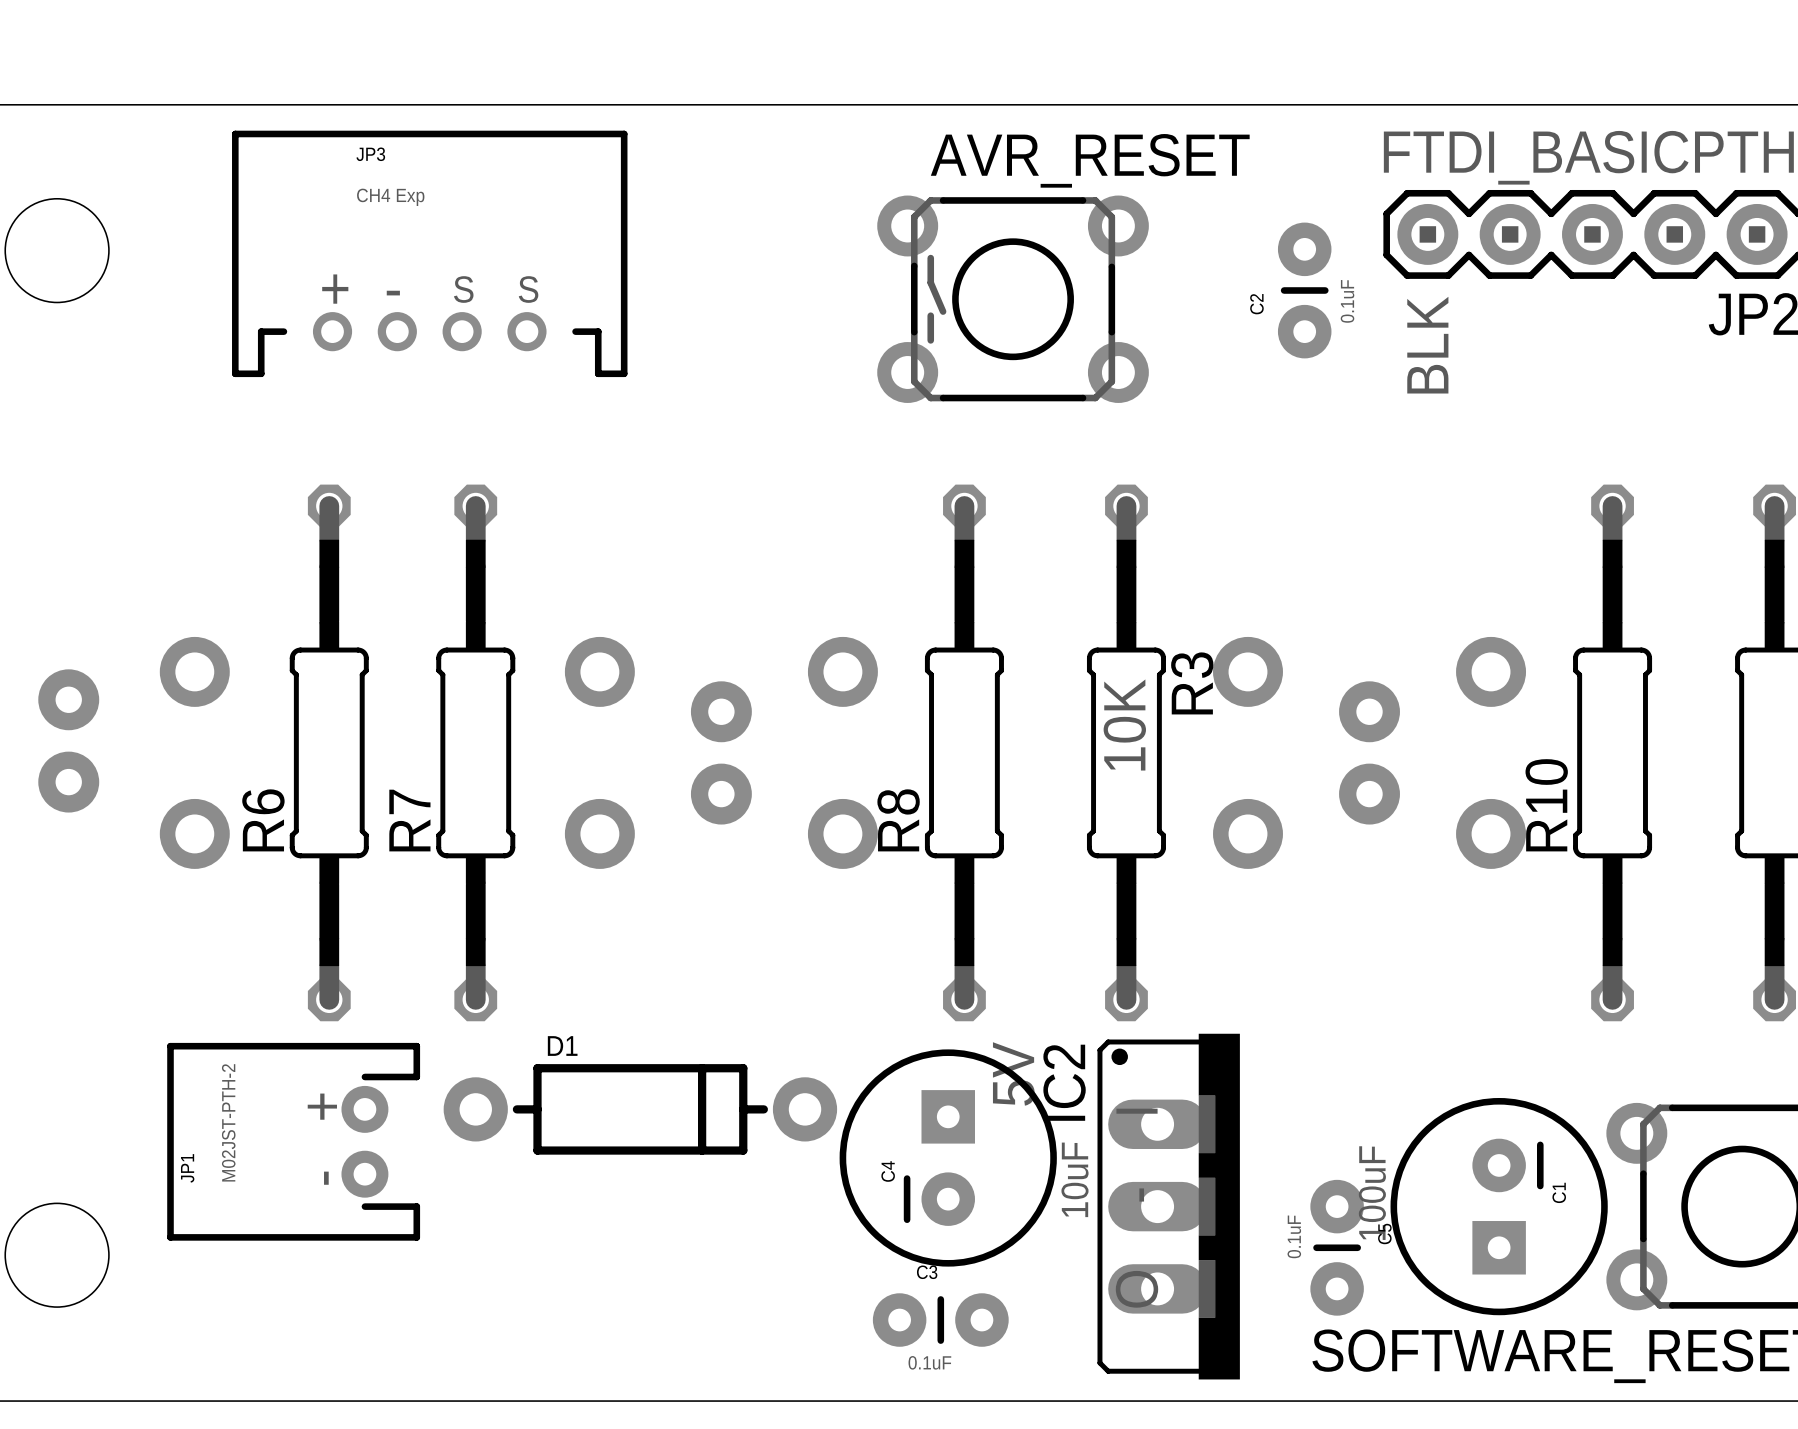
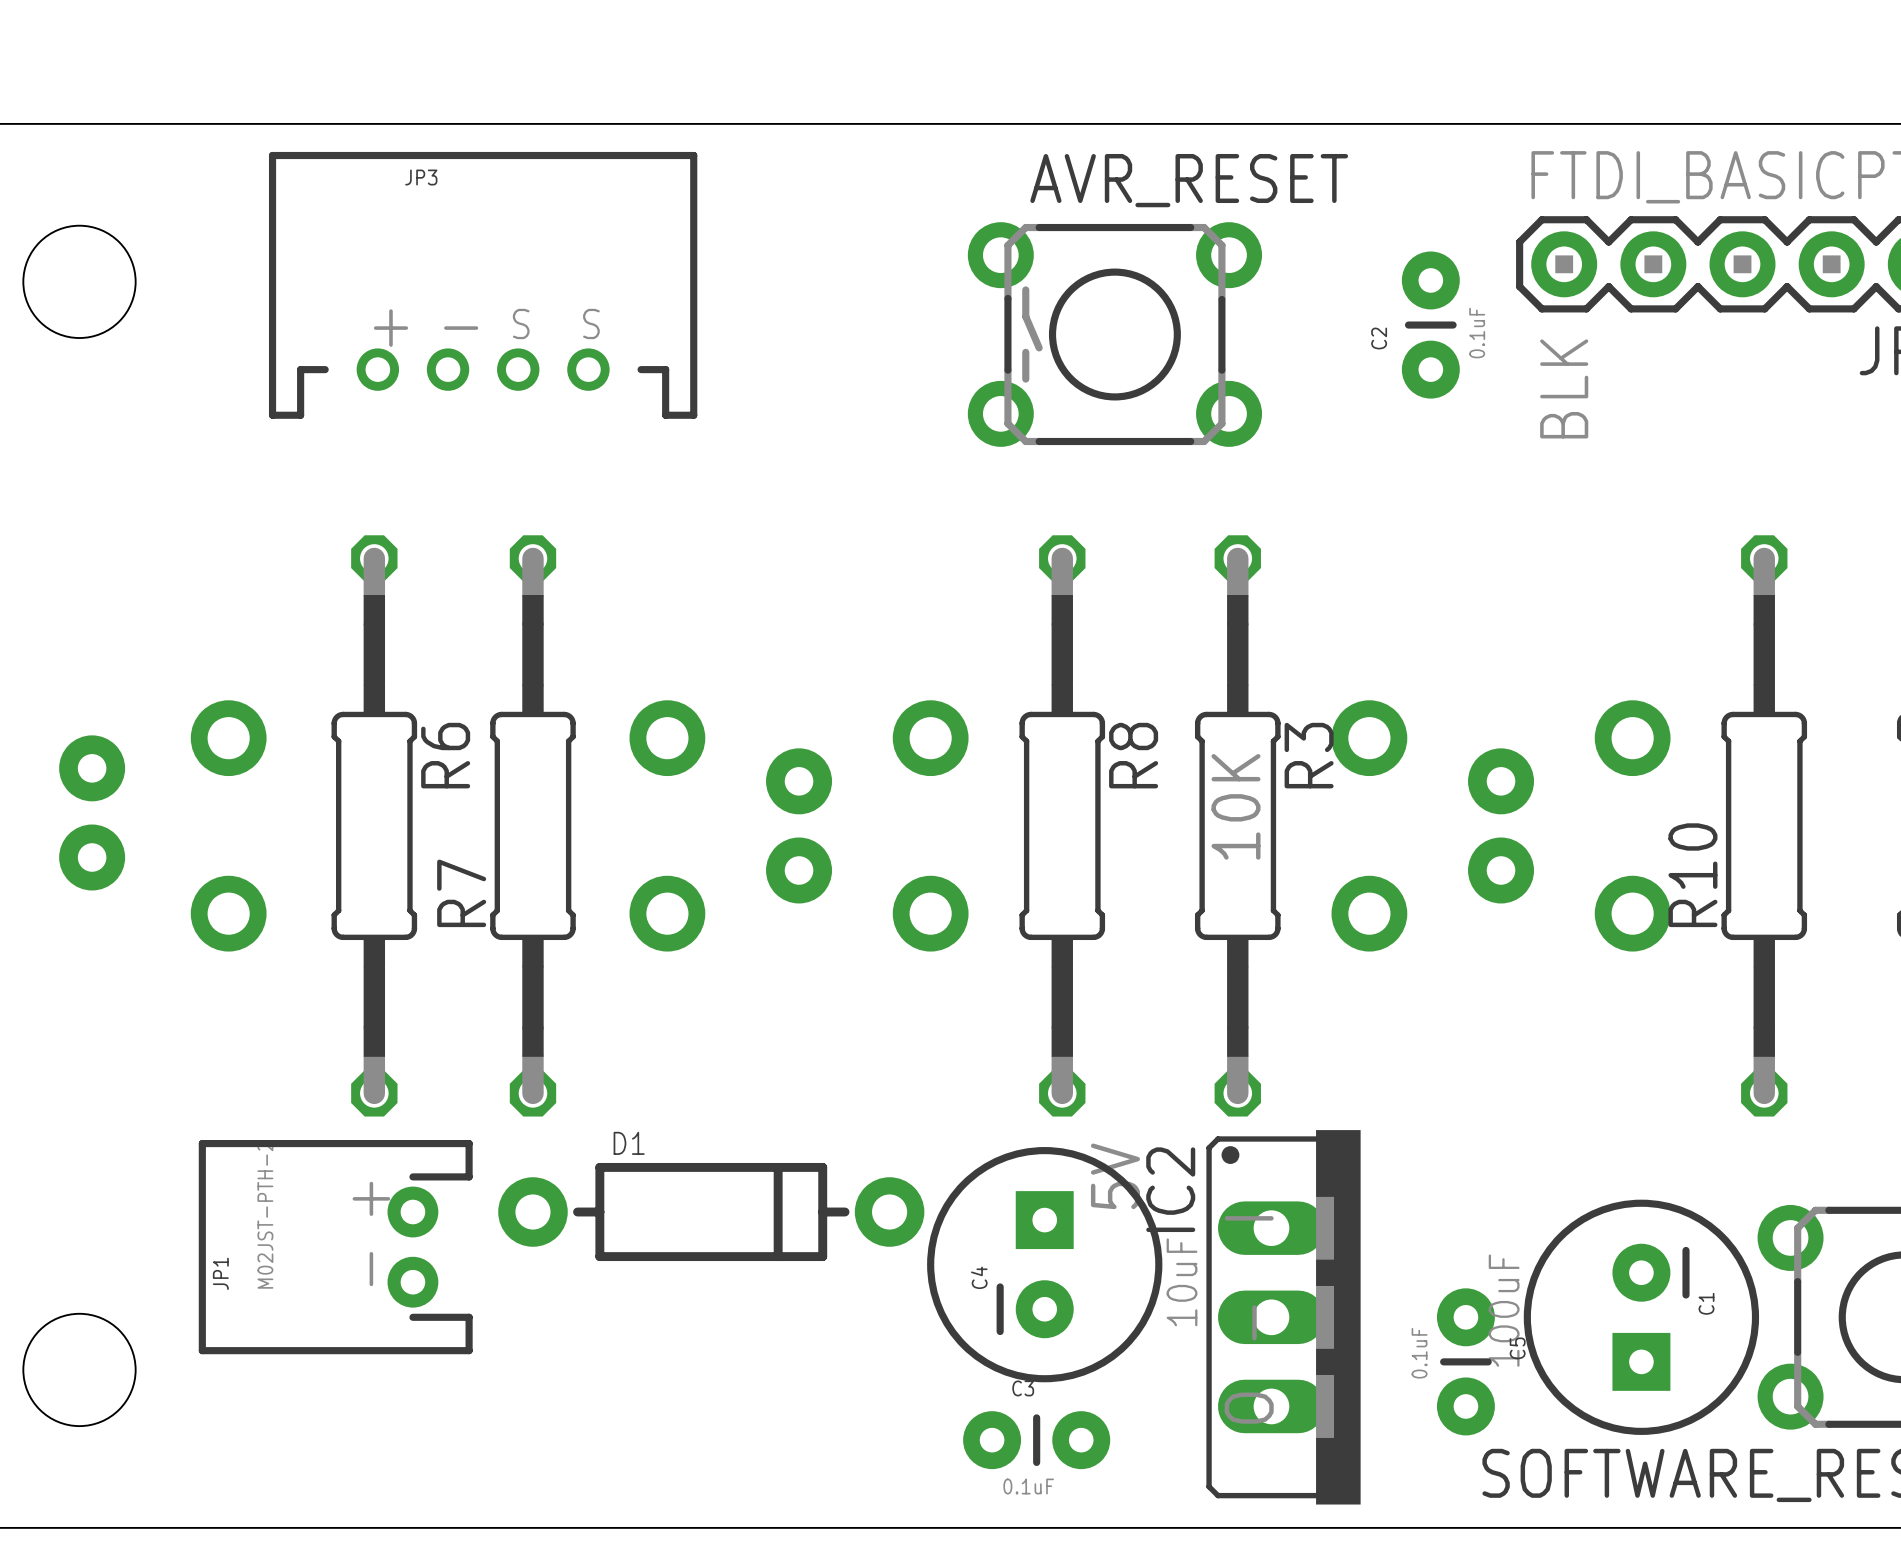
JP3 value: CH4 Exp (390, 197) -> none
R6 name position: R6 (263, 820) -> R6 (445, 755)
R8 name position: R8 (898, 820) -> R8 (1133, 755)

